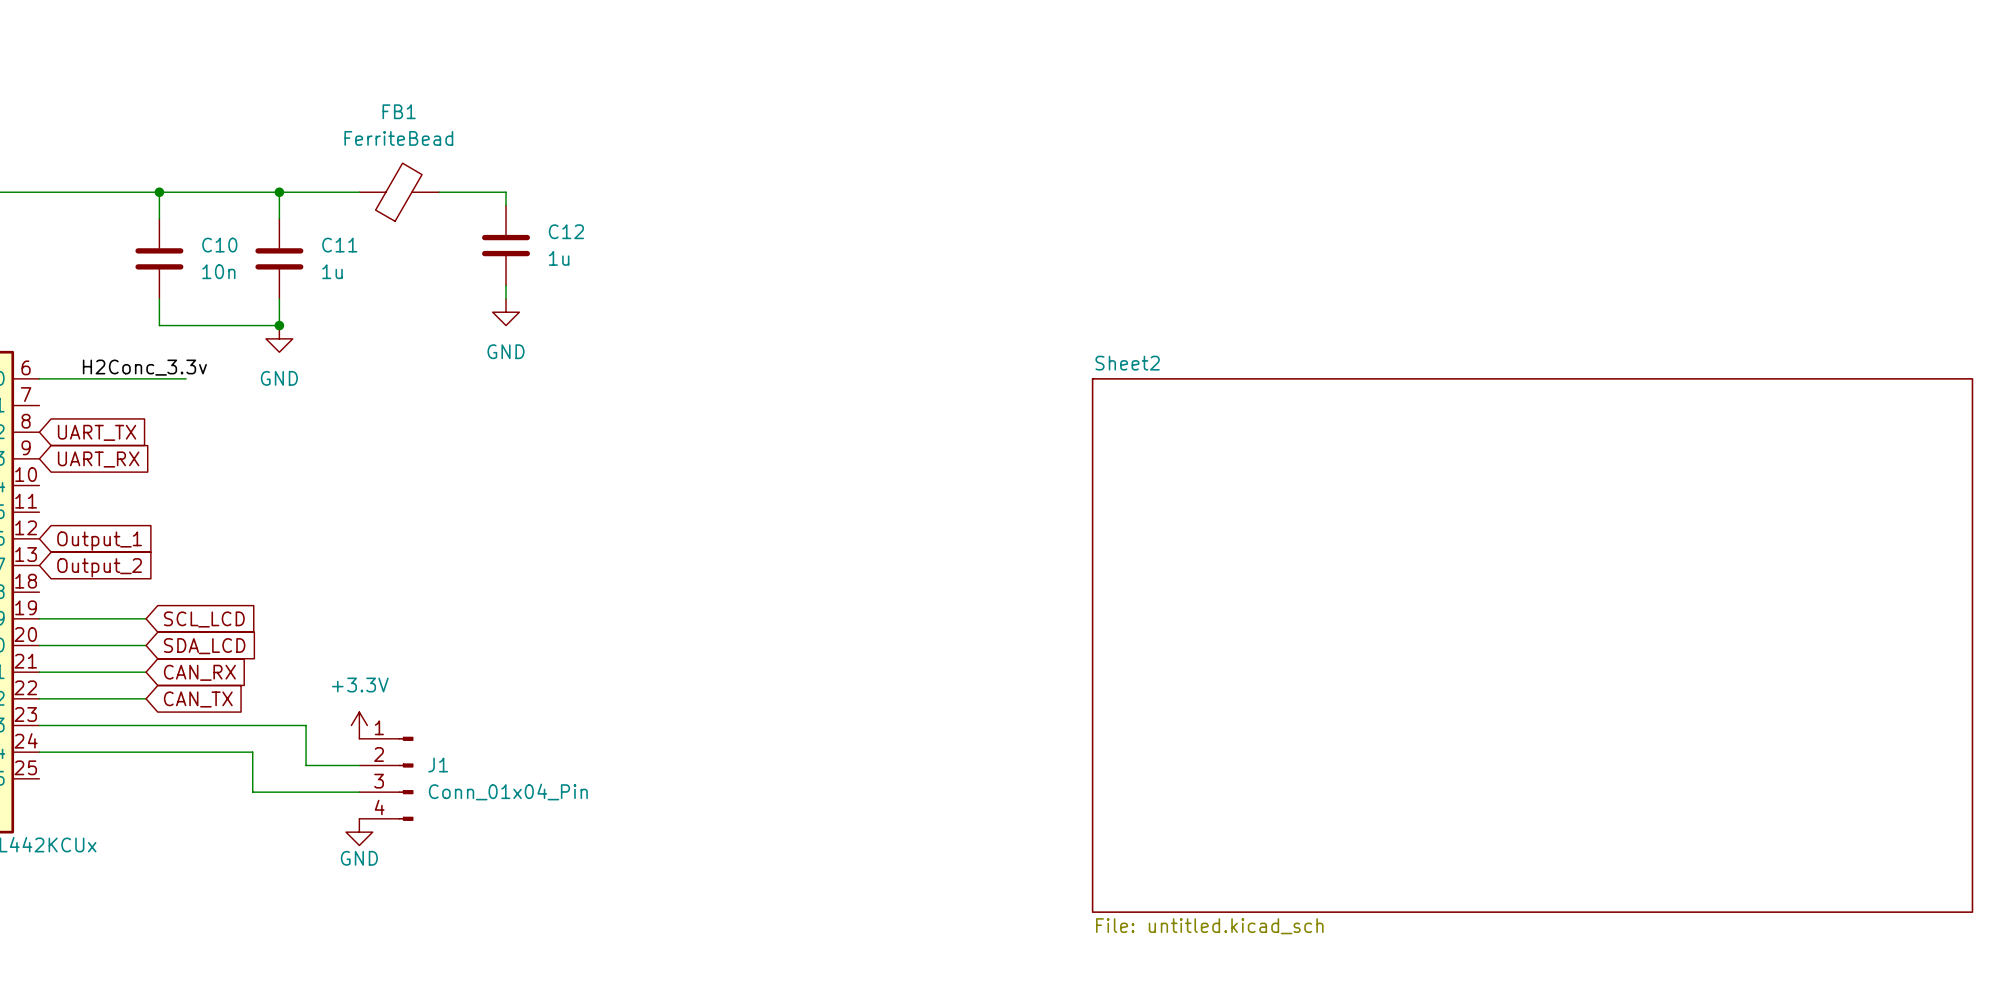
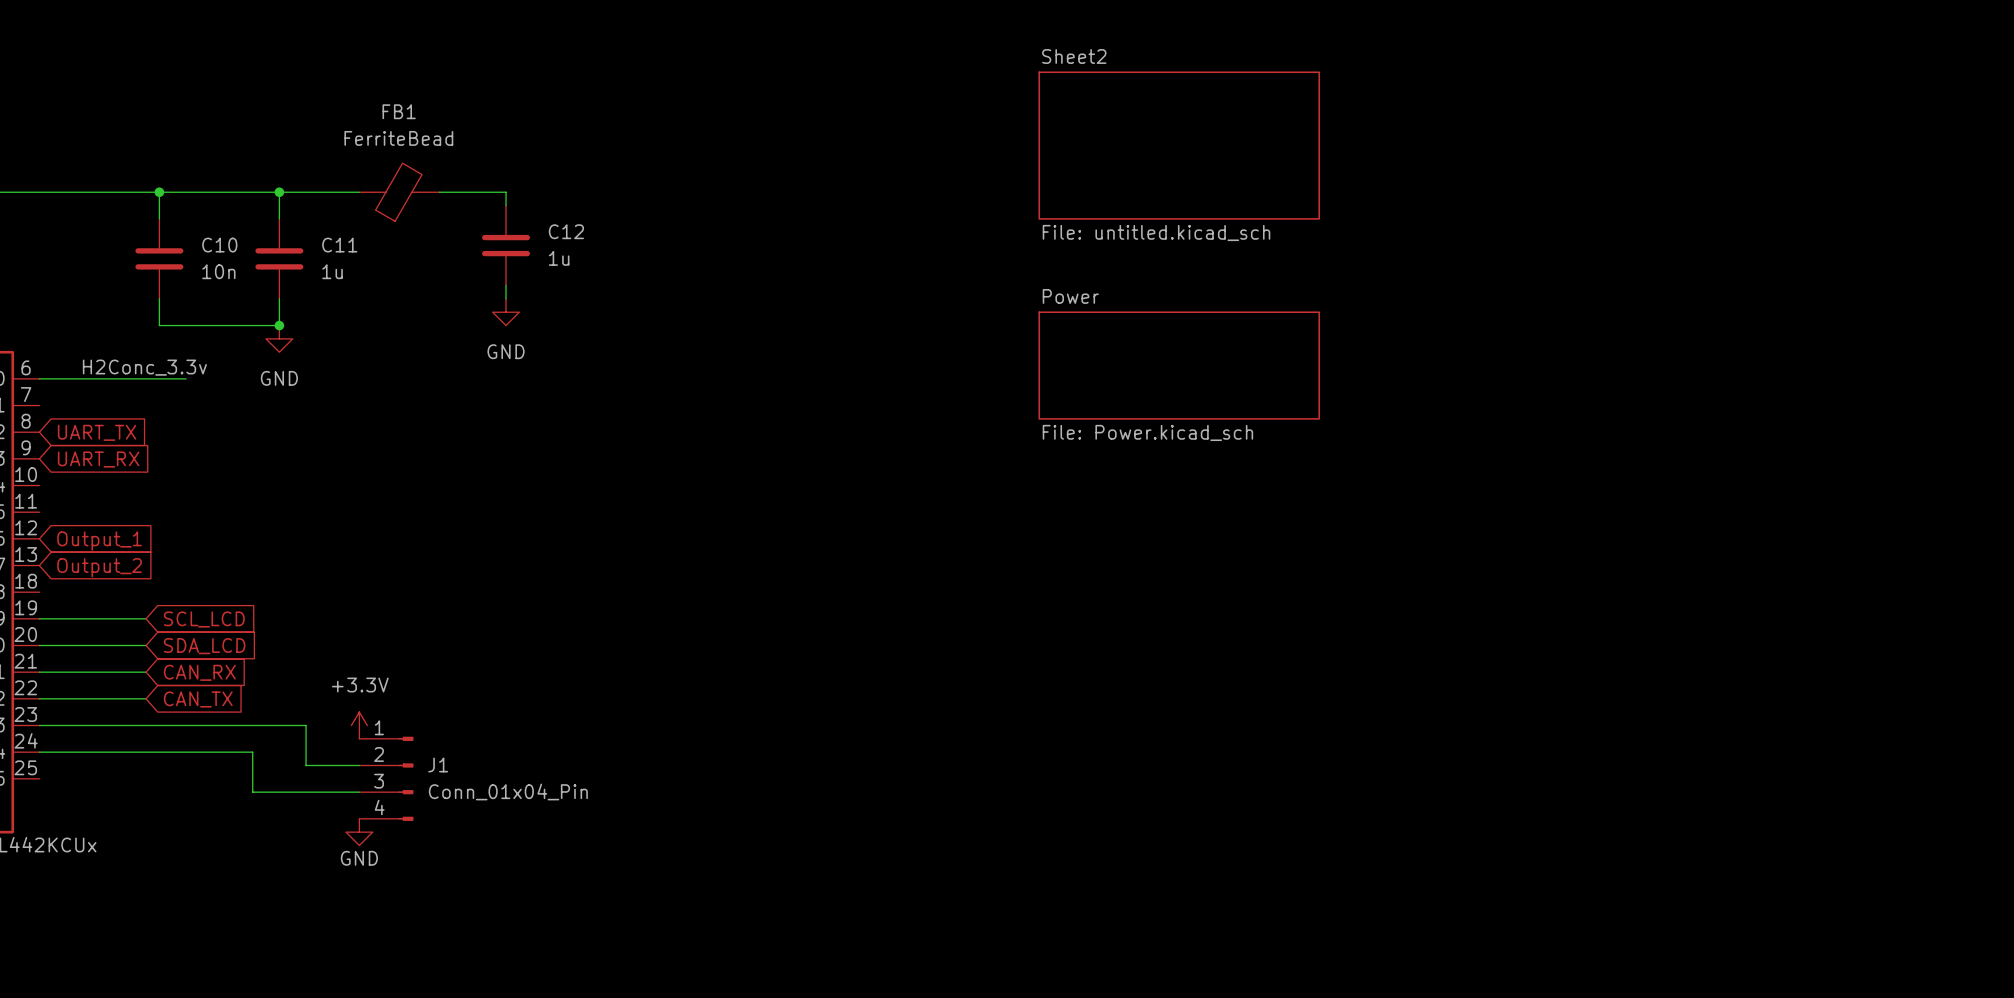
sheet Sheet2 name position: Sheet2 (1127, 363) -> Sheet2 (1074, 56)
sheet Power: none -> File: Power.kicad_sch (1179, 365)
sheet Sheet2 shape: [1091, 378, 1974, 913] -> [1038, 71, 1321, 220]
sheet Sheet2 value position: File: untitled.kicad_sch (1209, 926) -> File: untitled.kicad_sch (1156, 232)

